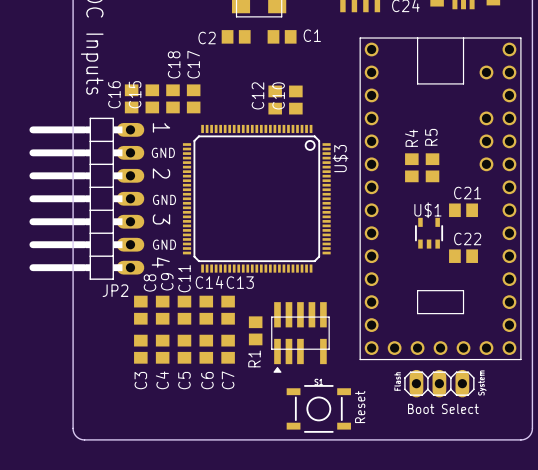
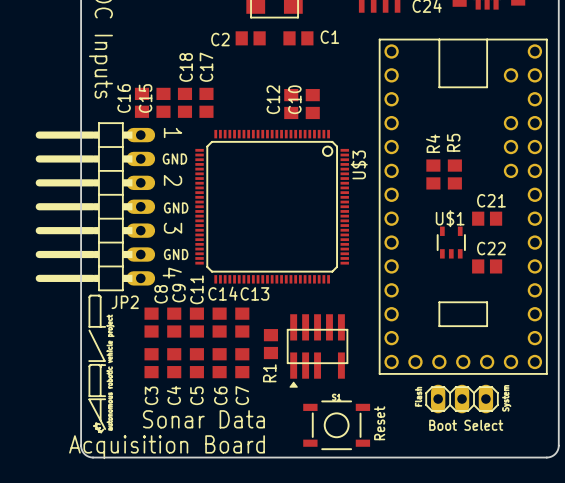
drawing: none -> [88, 295, 106, 433]
text: none -> Sonar Data (203, 419)
text: none -> Acquisition Board (167, 447)

